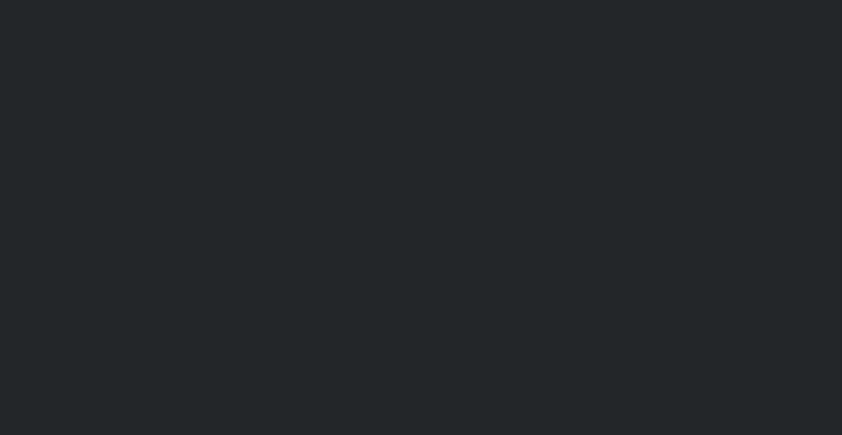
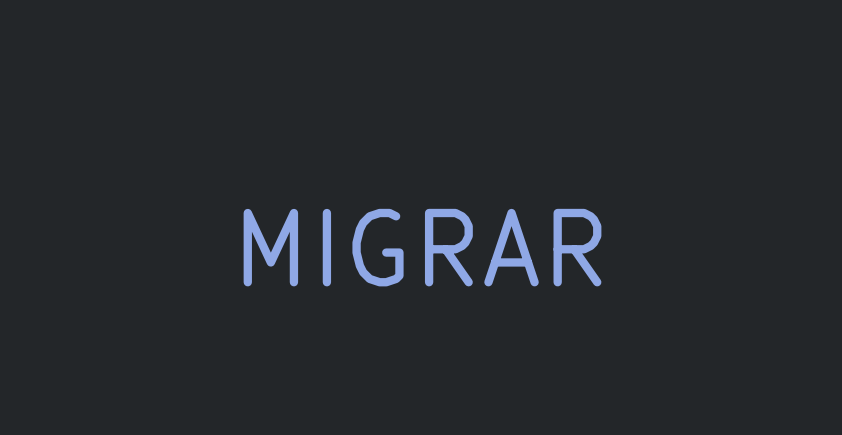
text: none -> MIGRAR (422, 247)

